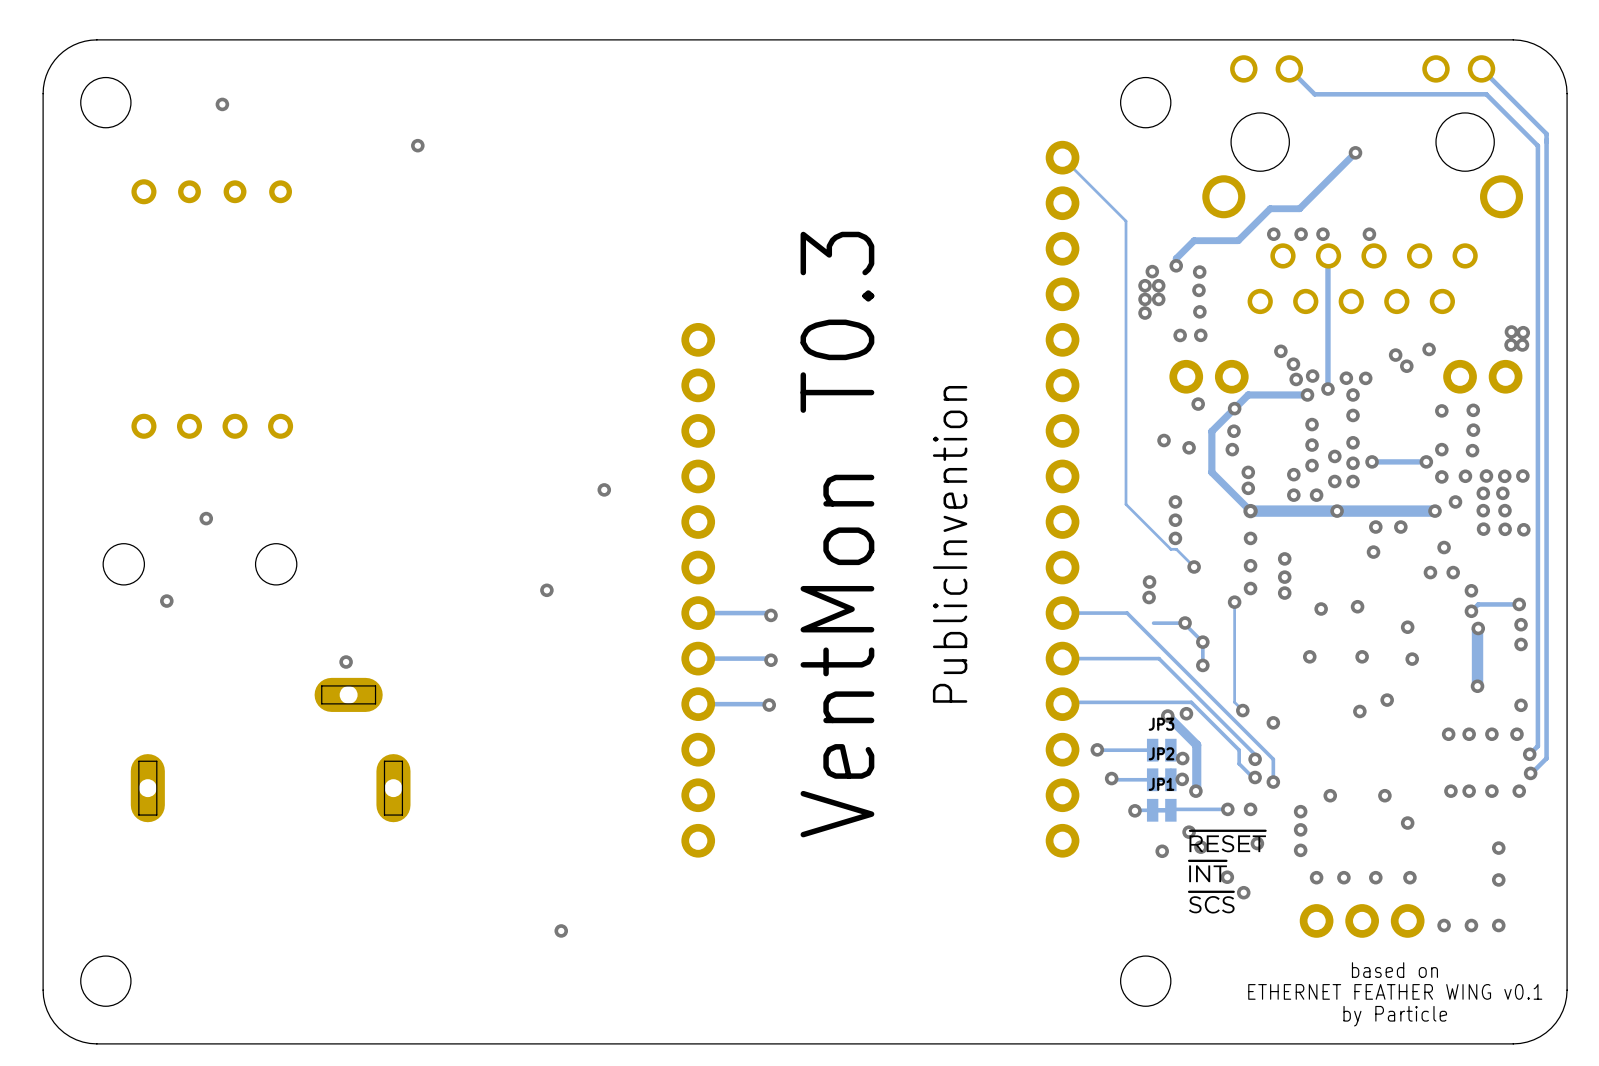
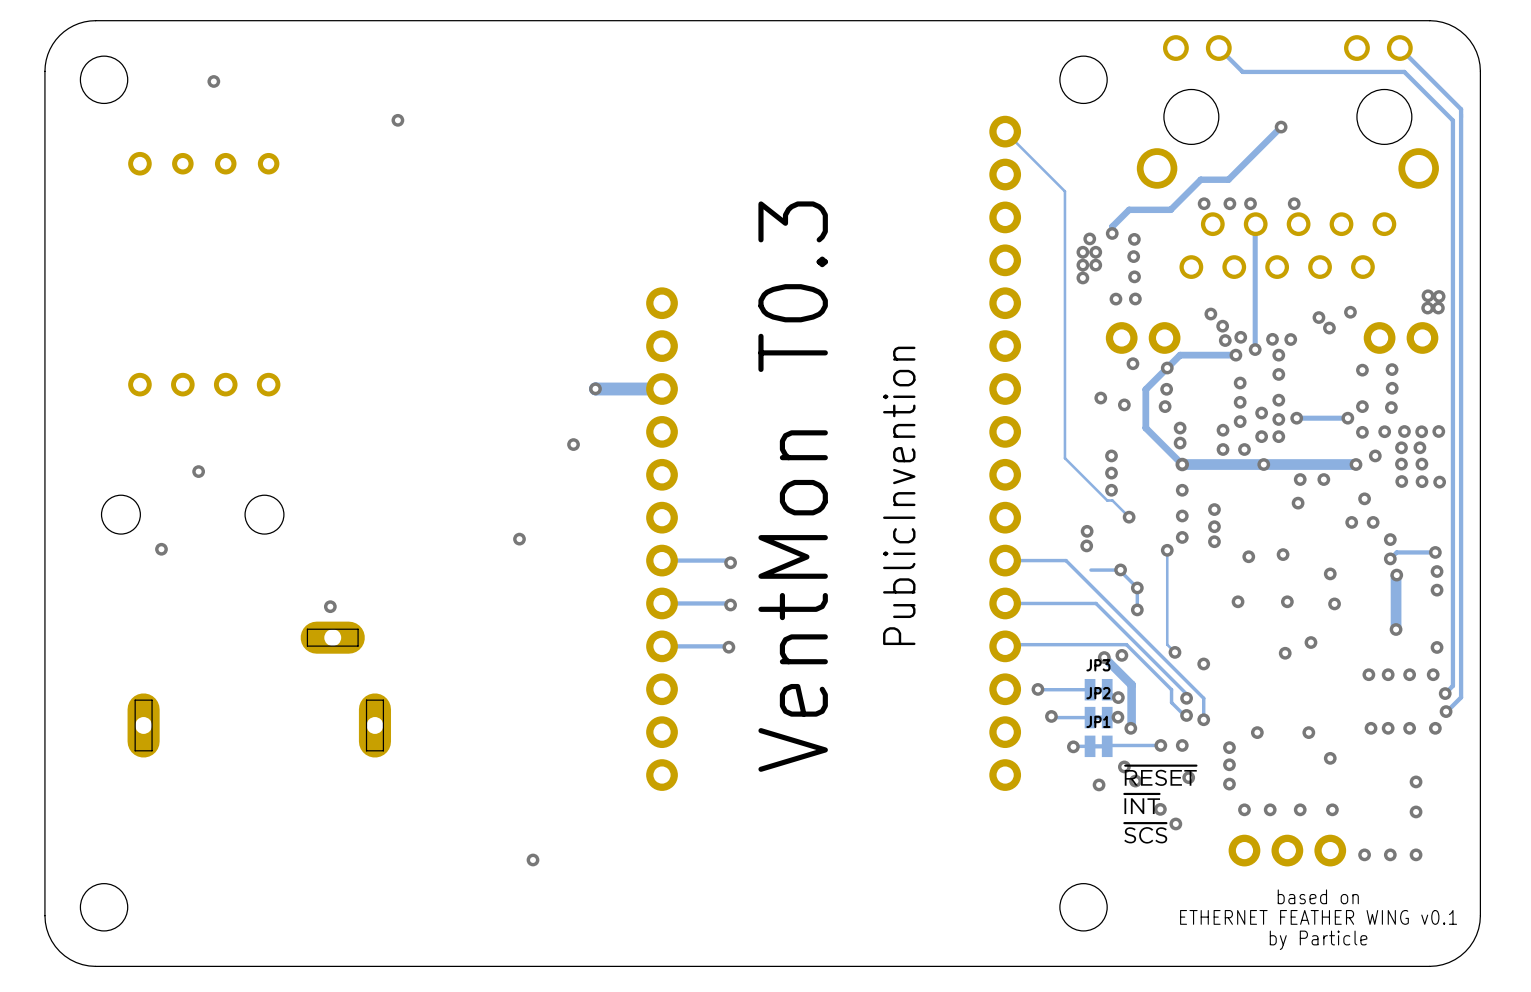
via: none -> (595, 388)
track: none -> (662, 389) (595, 389)

